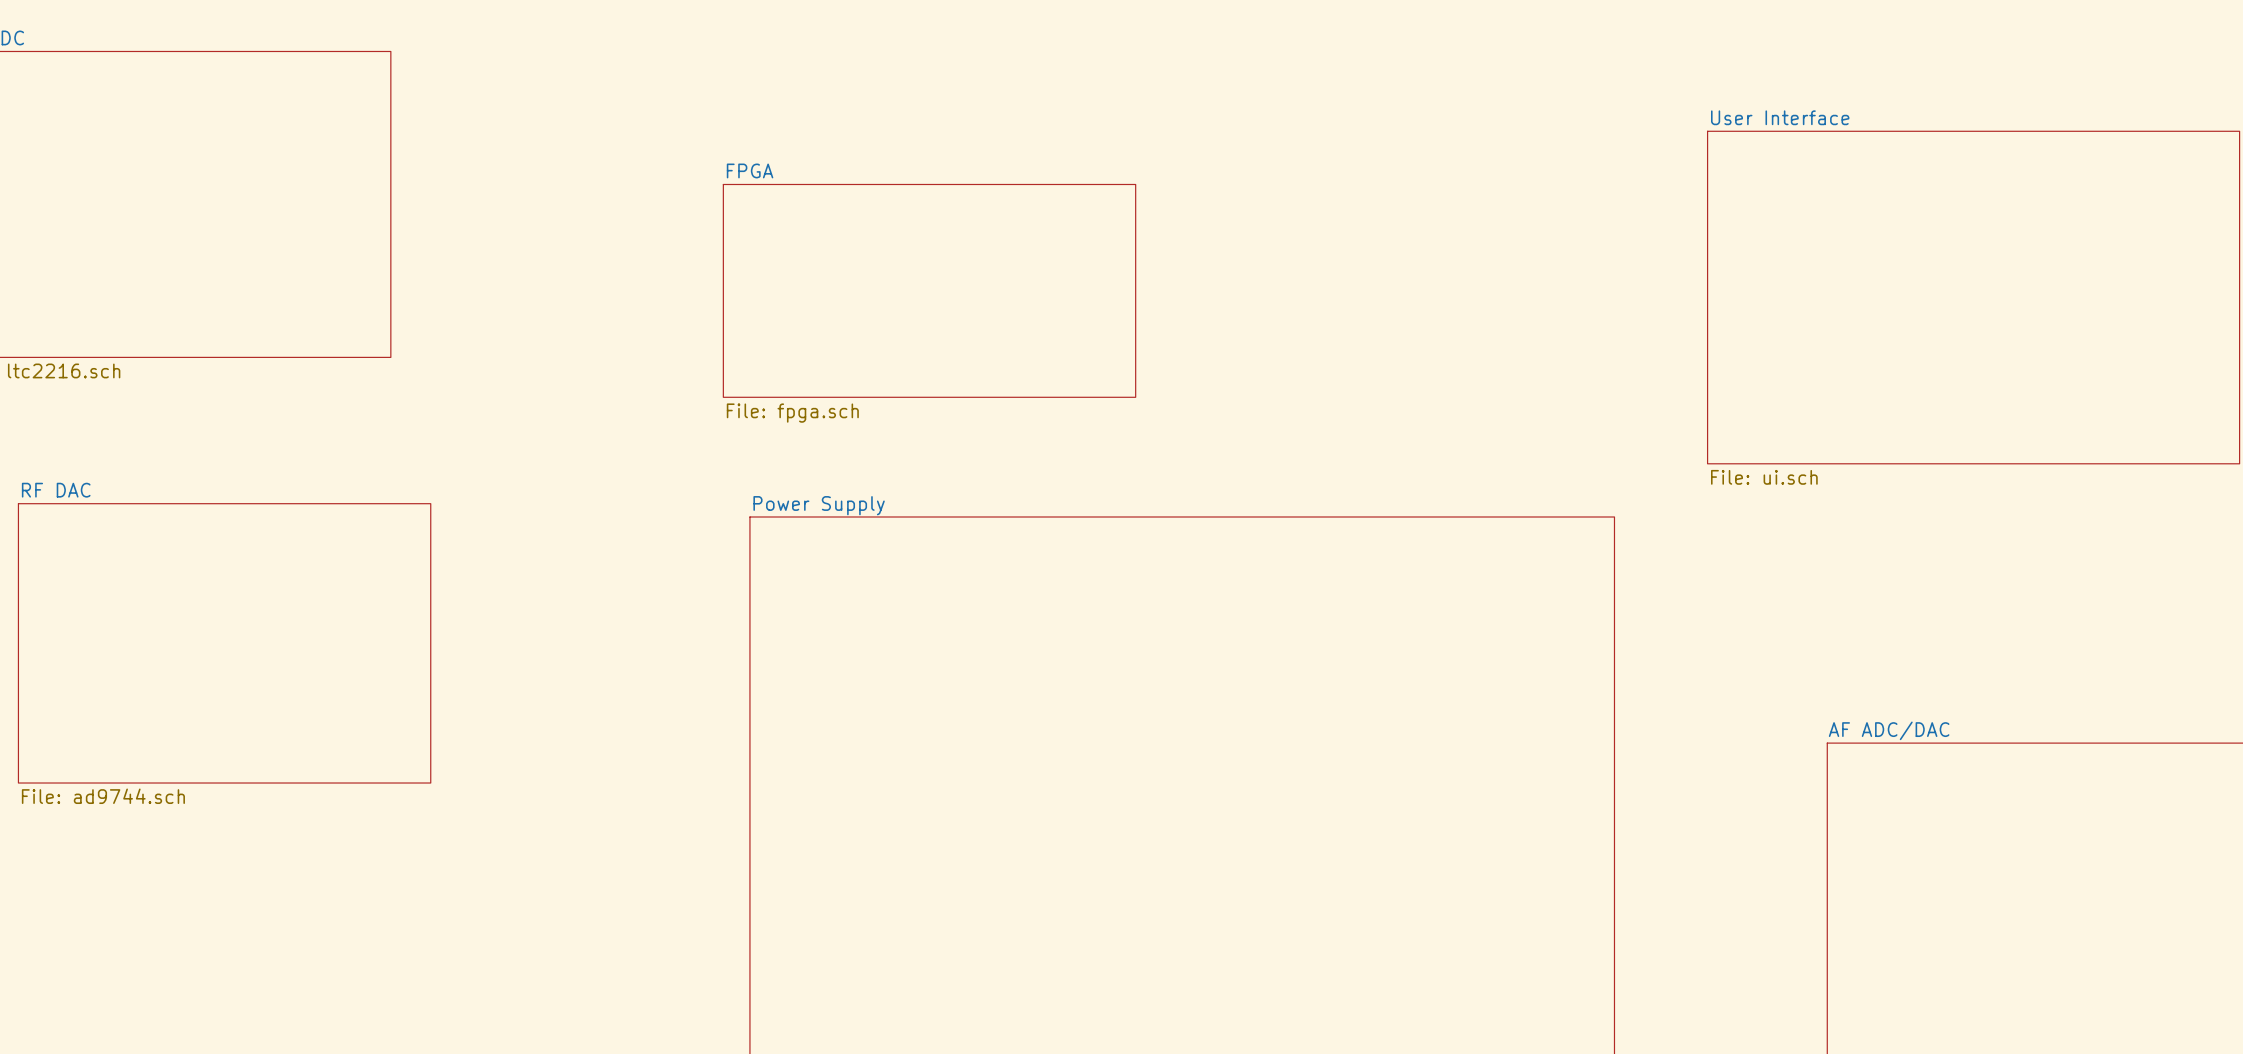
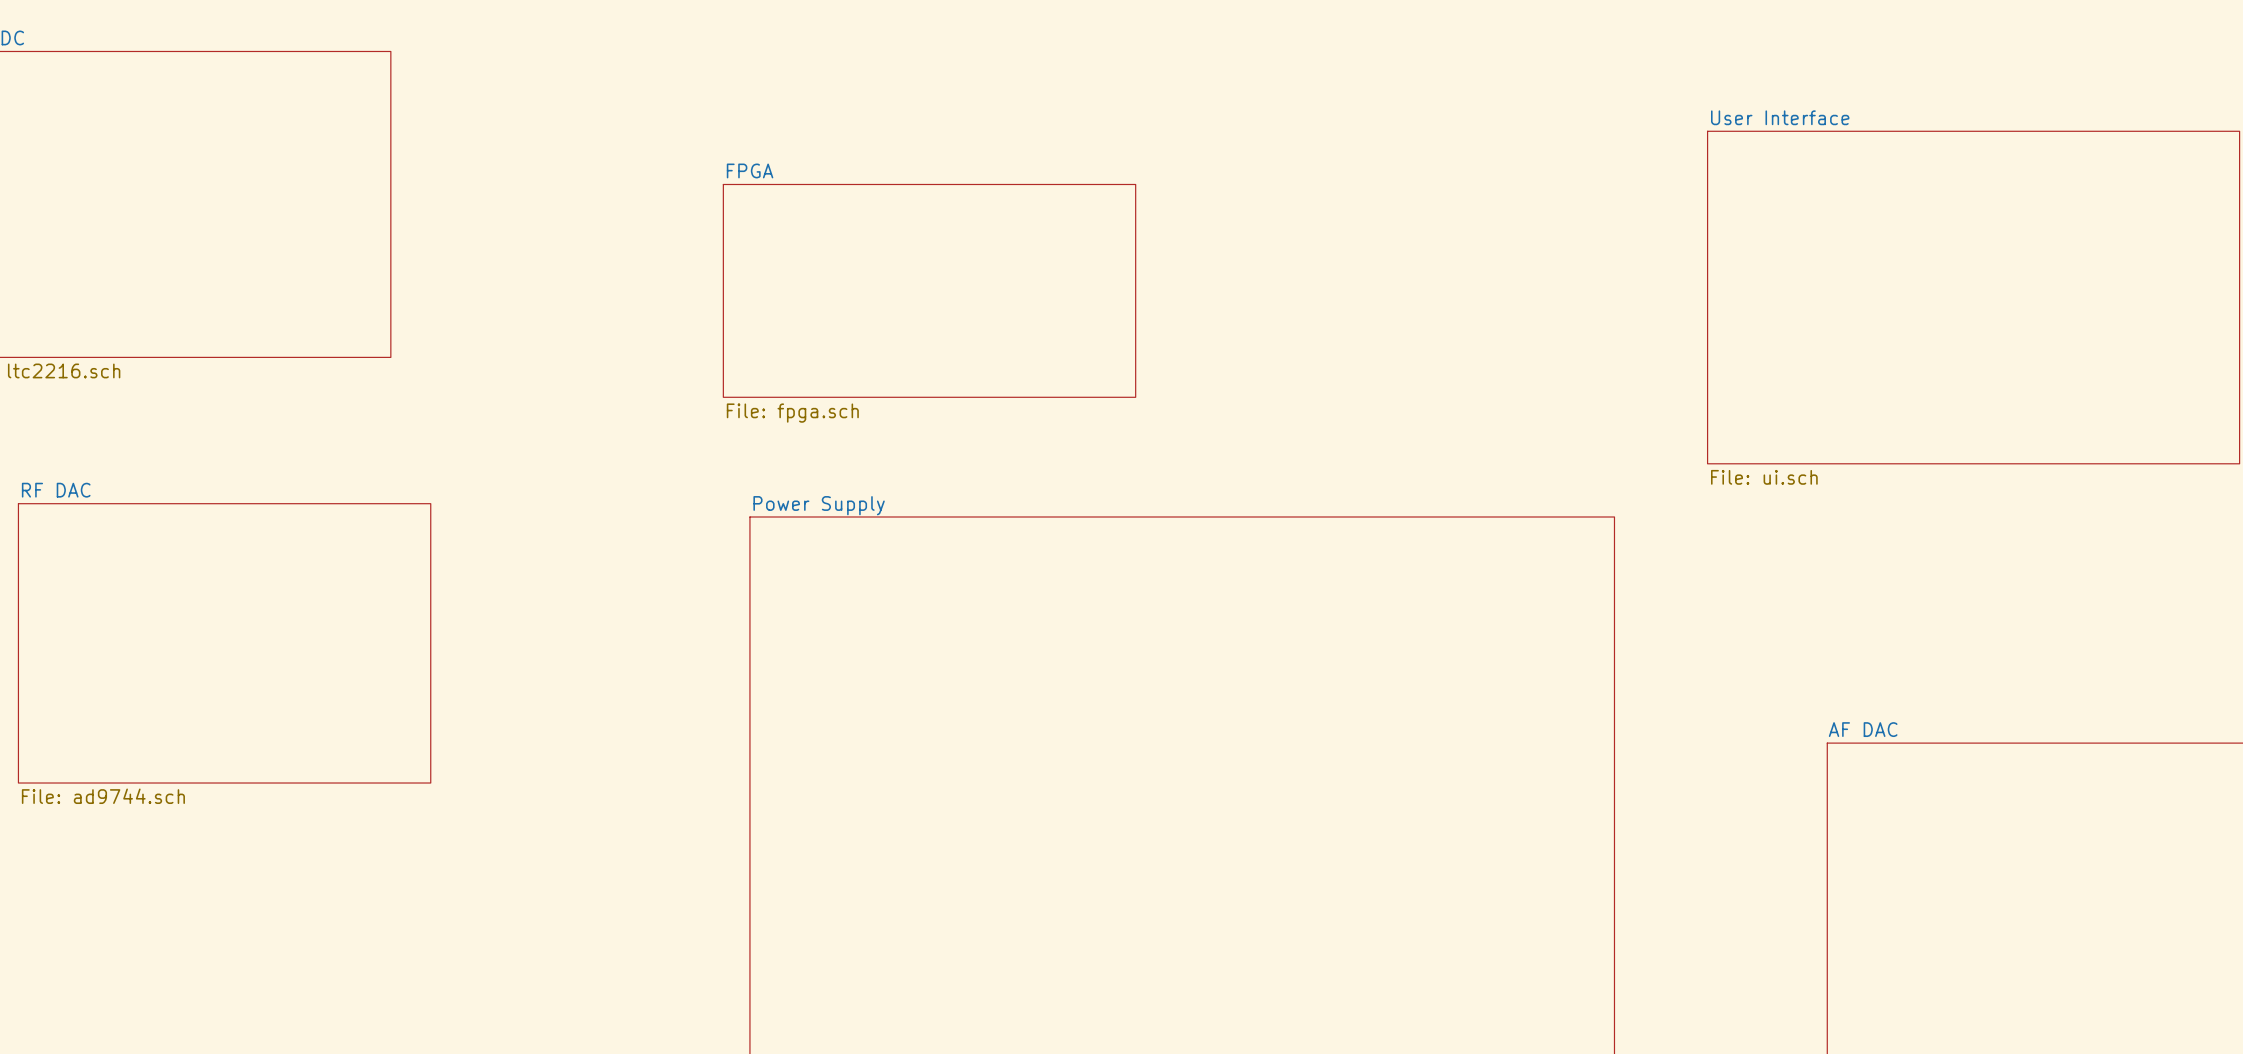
sheet AF ADC/DAC name: AF ADC/DAC (1889, 730) -> AF DAC (1863, 729)

